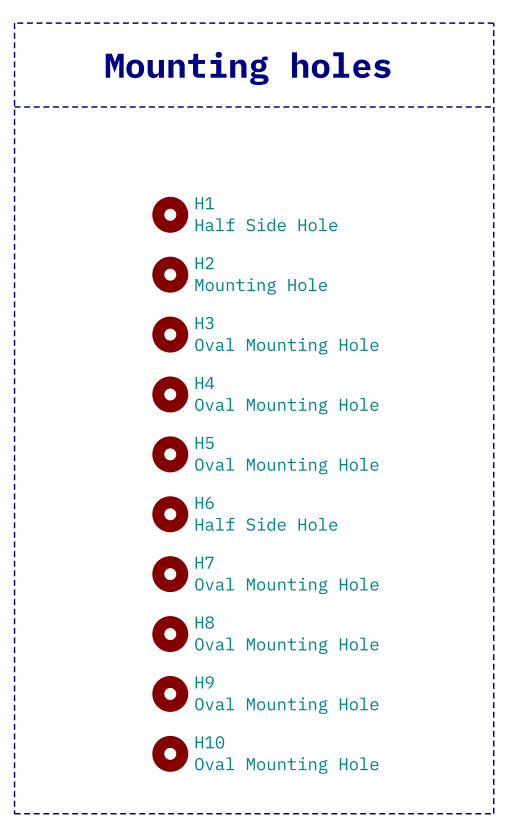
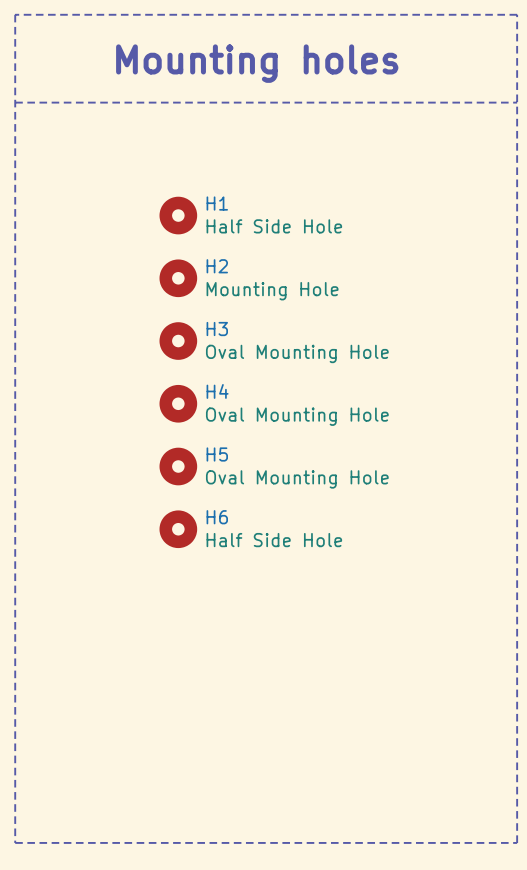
H7: Oval Mounting Hole (170, 574) -> none
H8: Oval Mounting Hole (170, 634) -> none
H9: Oval Mounting Hole (170, 693) -> none
H10: Oval Mounting Hole (170, 753) -> none

